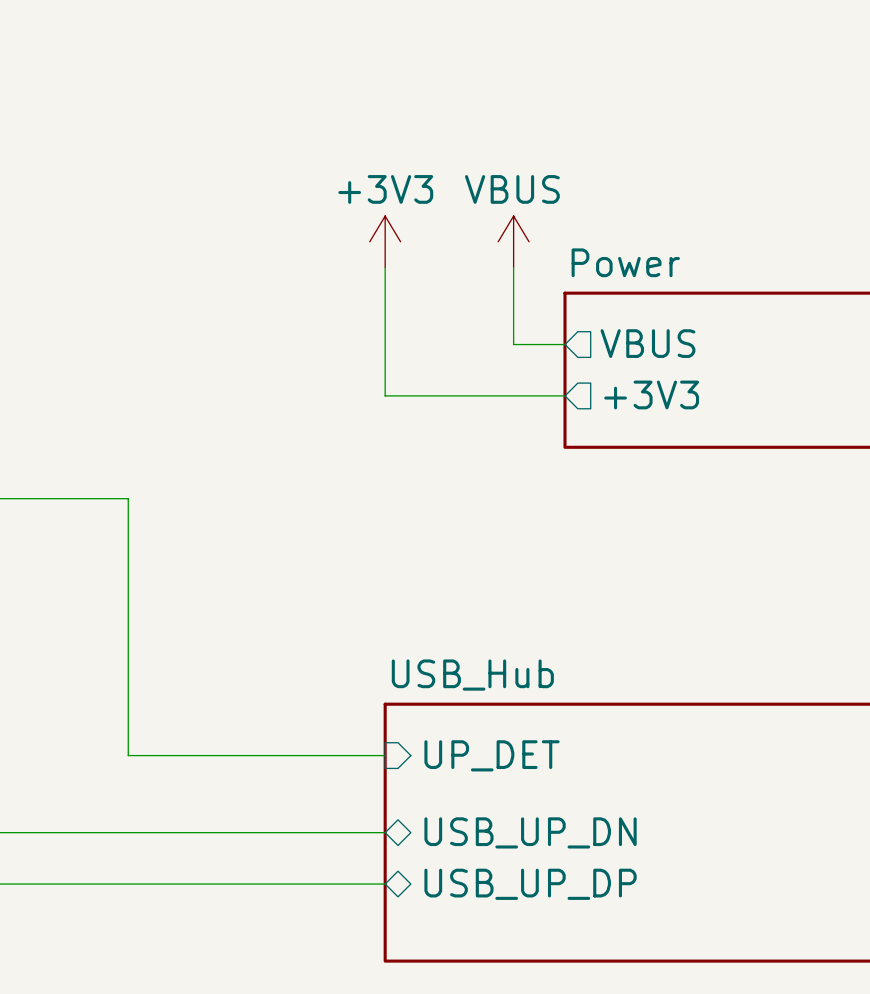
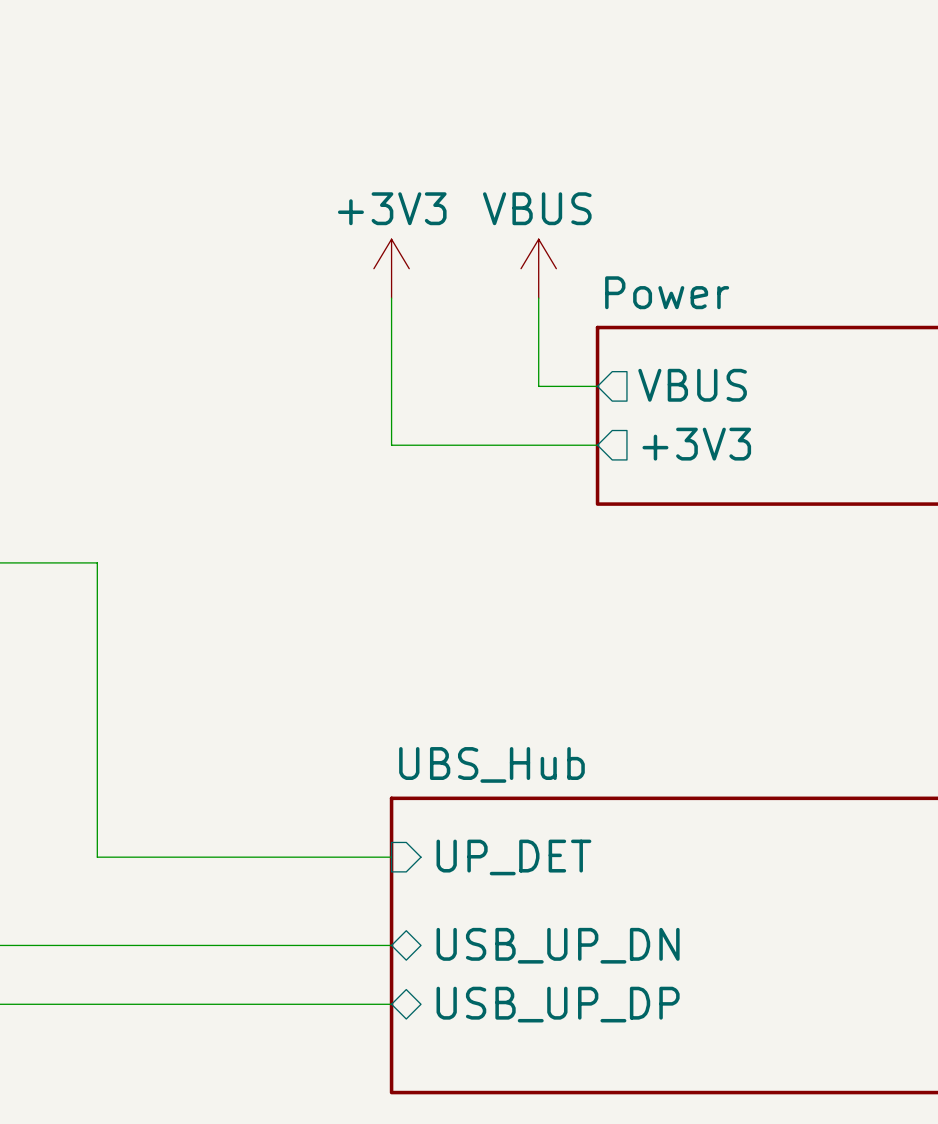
sheet USB_Hub name: USB_Hub (472, 675) -> UBS_Hub (491, 764)

